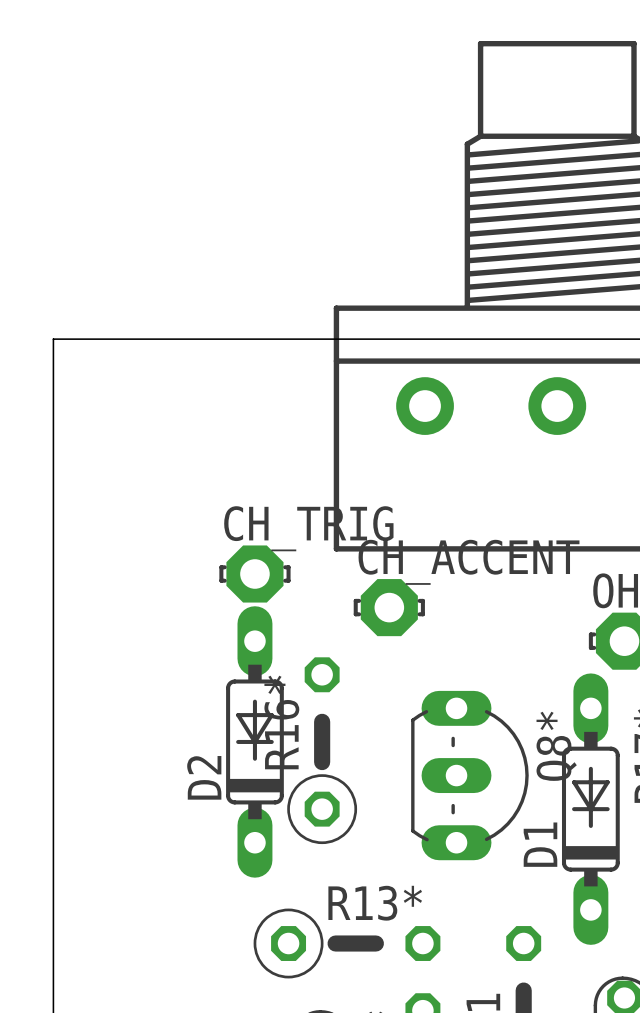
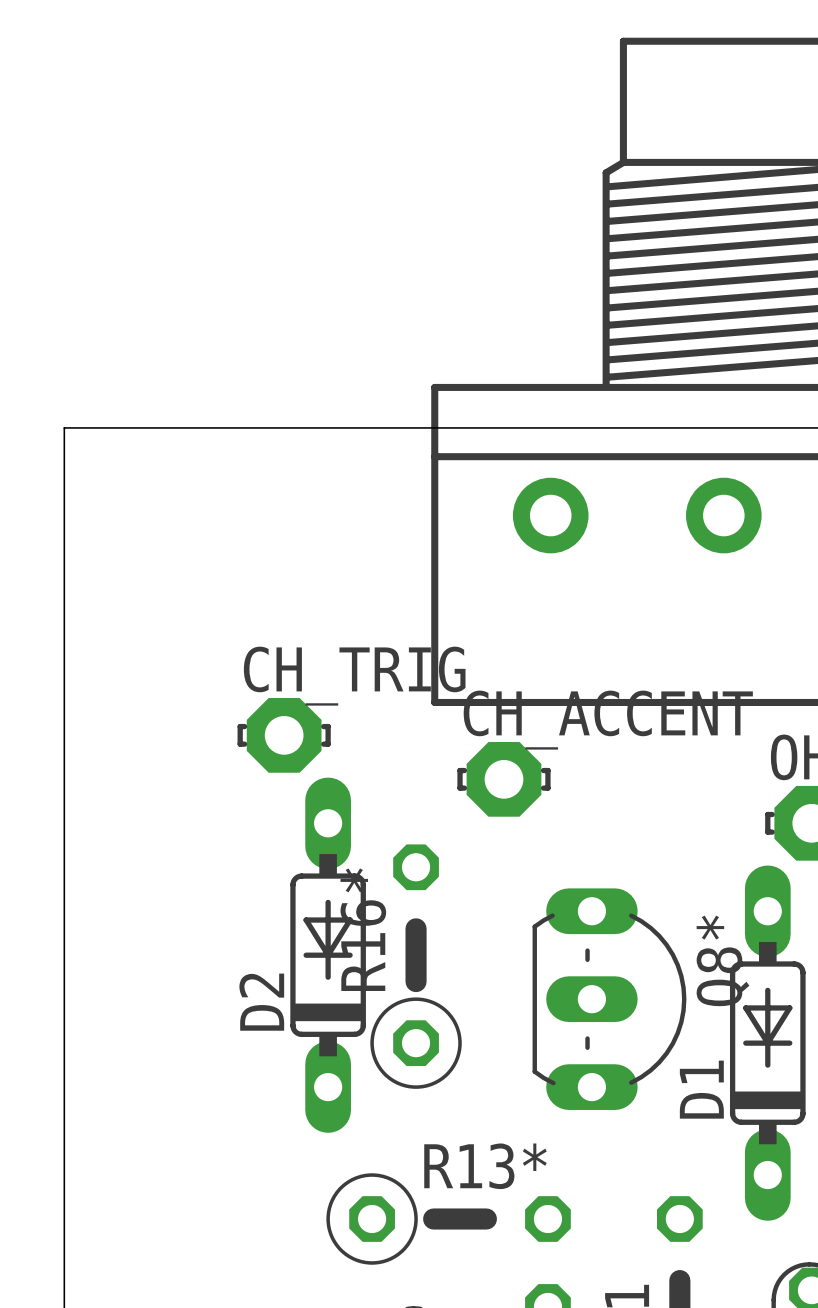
CH_TRIG position: (254, 574) -> (284, 735)

